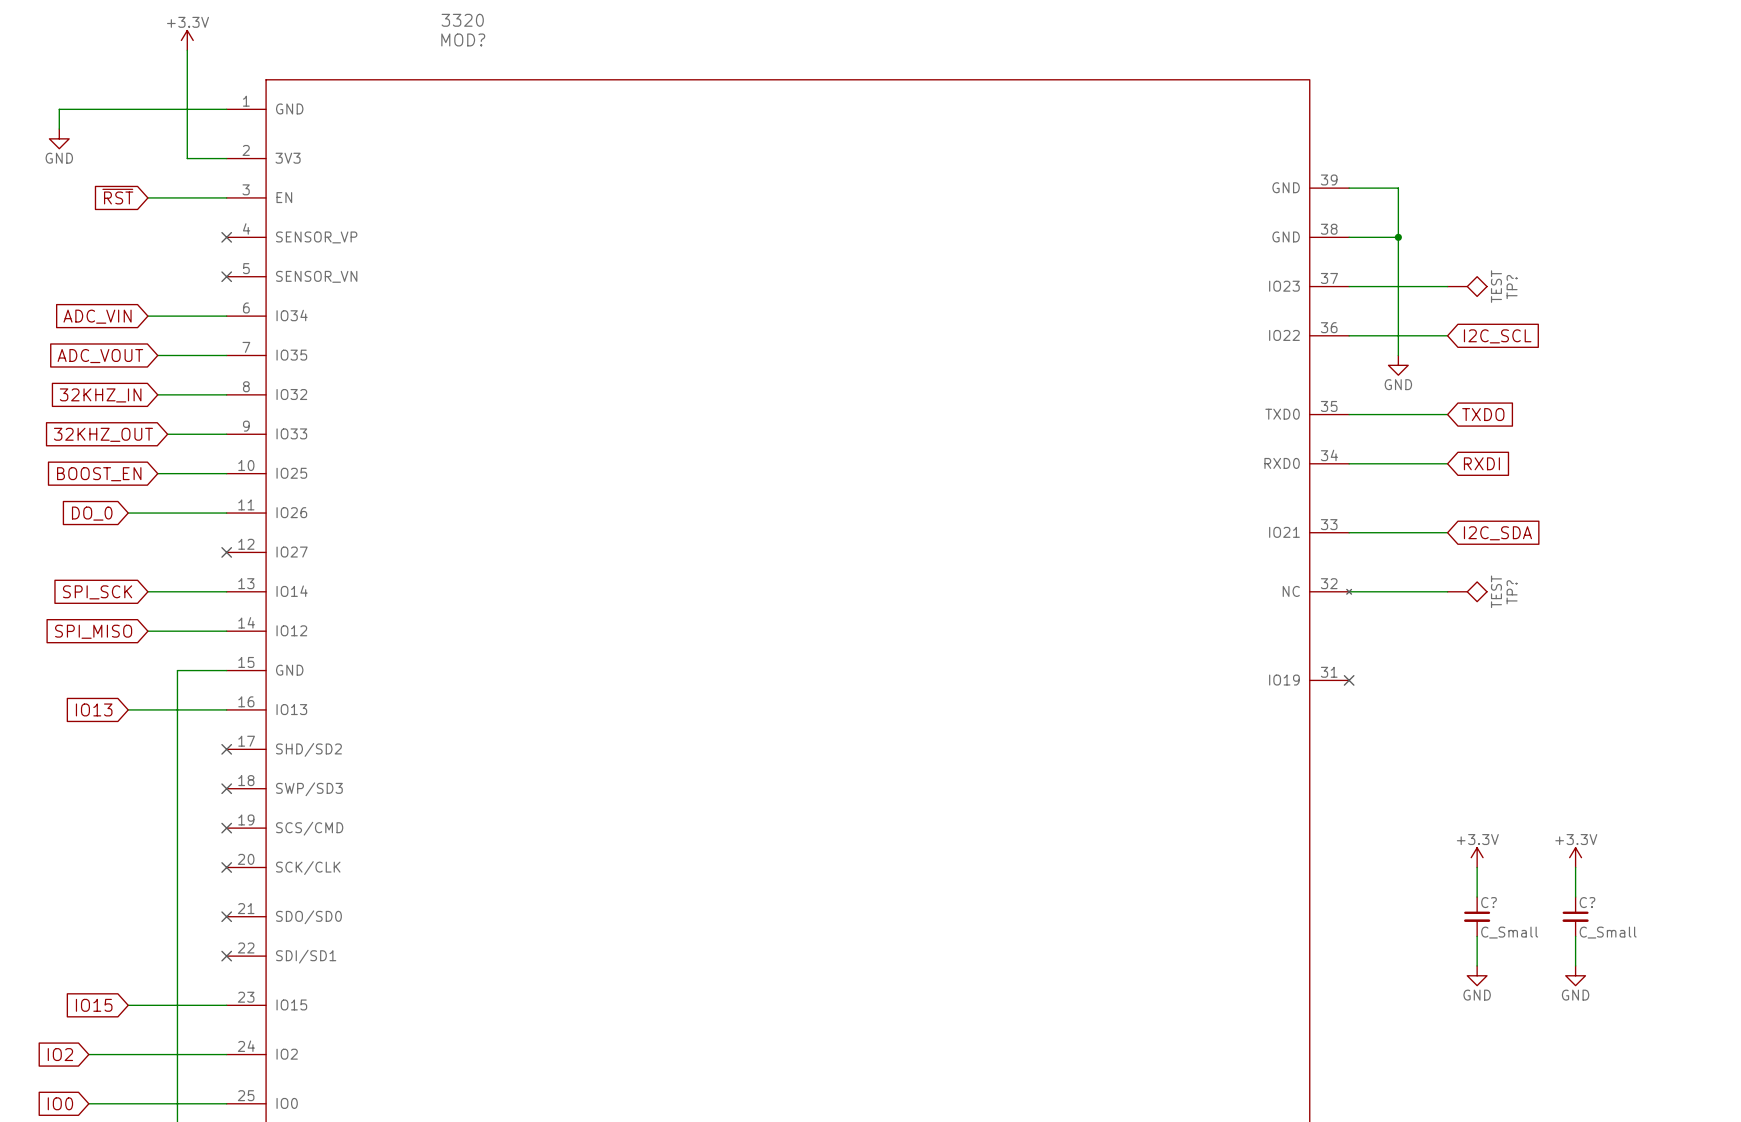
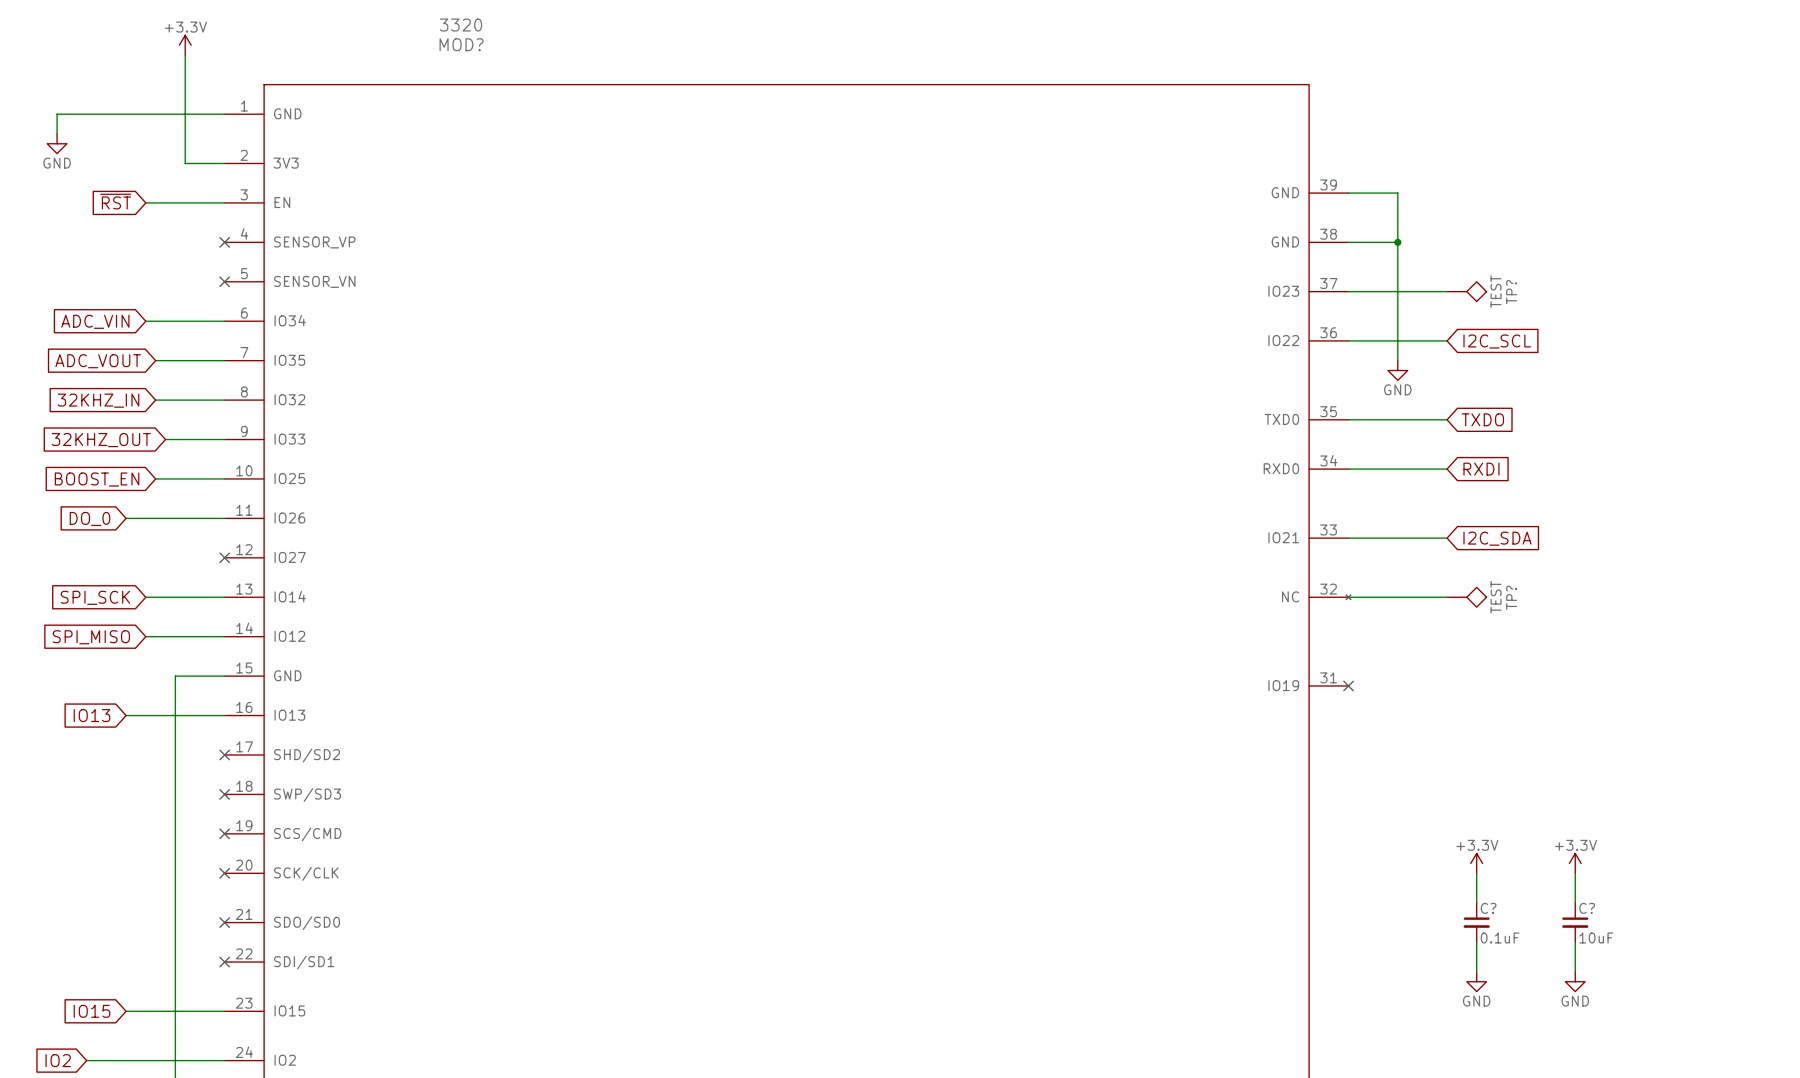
C? value: C_Small (1509, 932) -> 0.1uF (1500, 937)
C? value: C_Small (1608, 932) -> 10uF (1596, 937)

